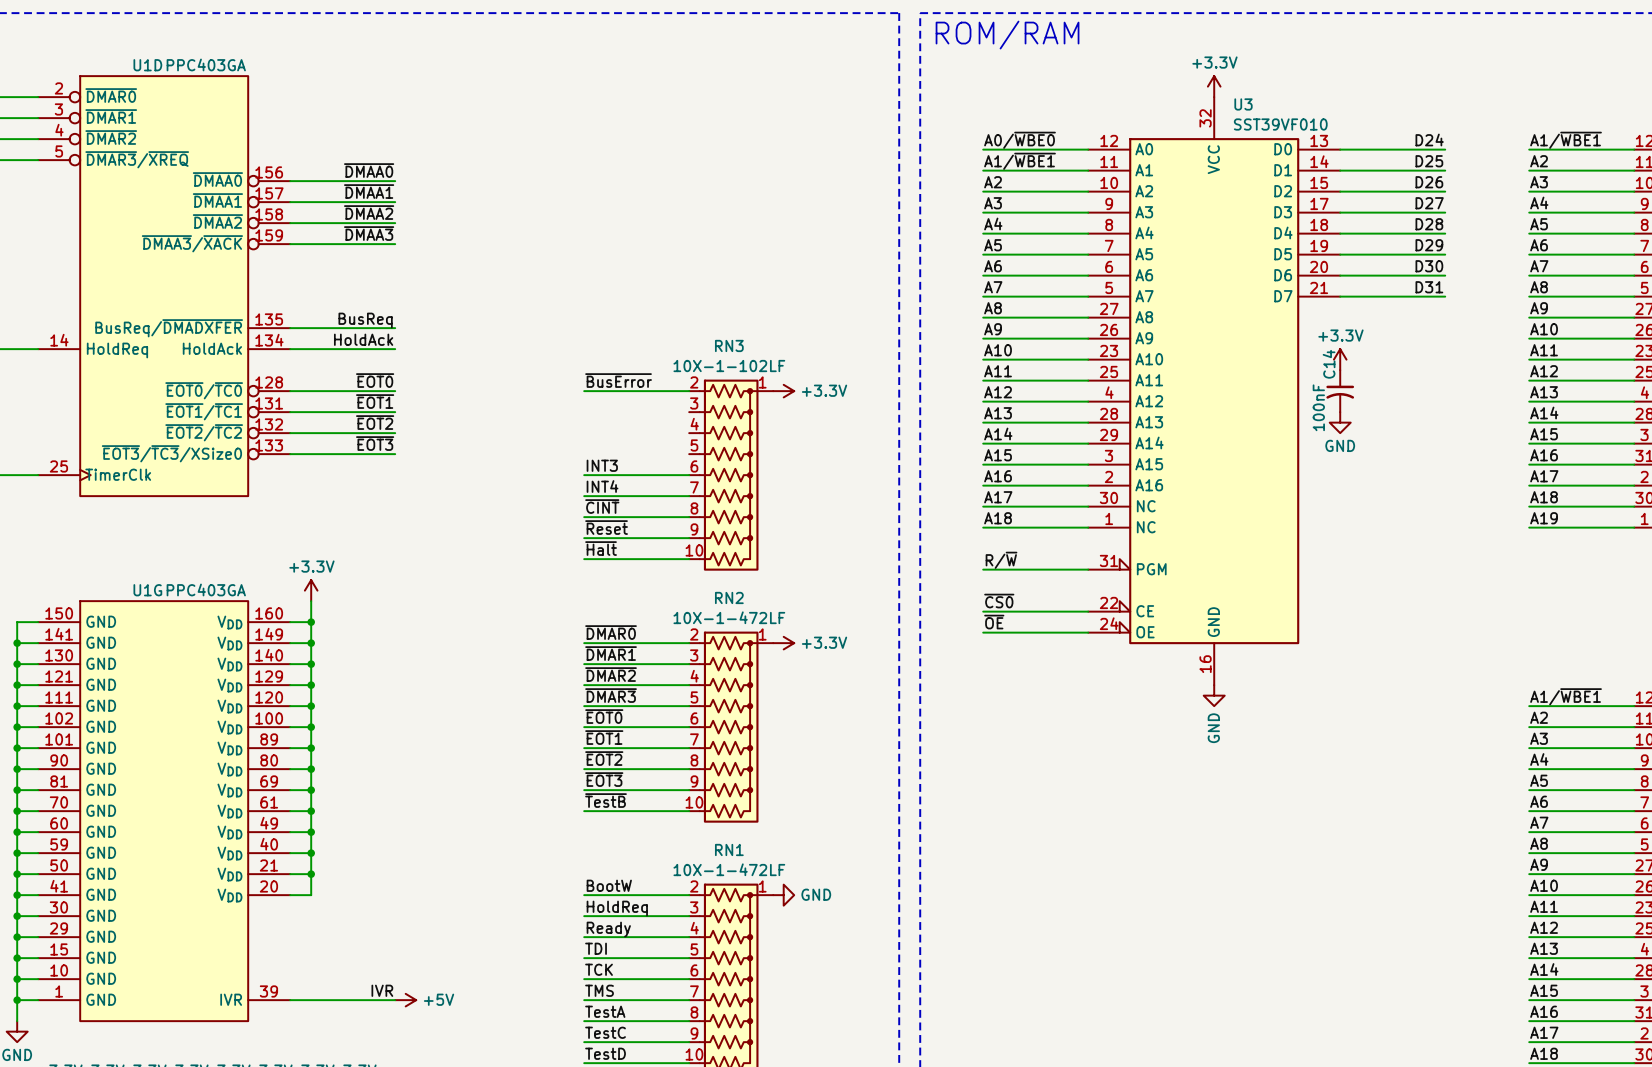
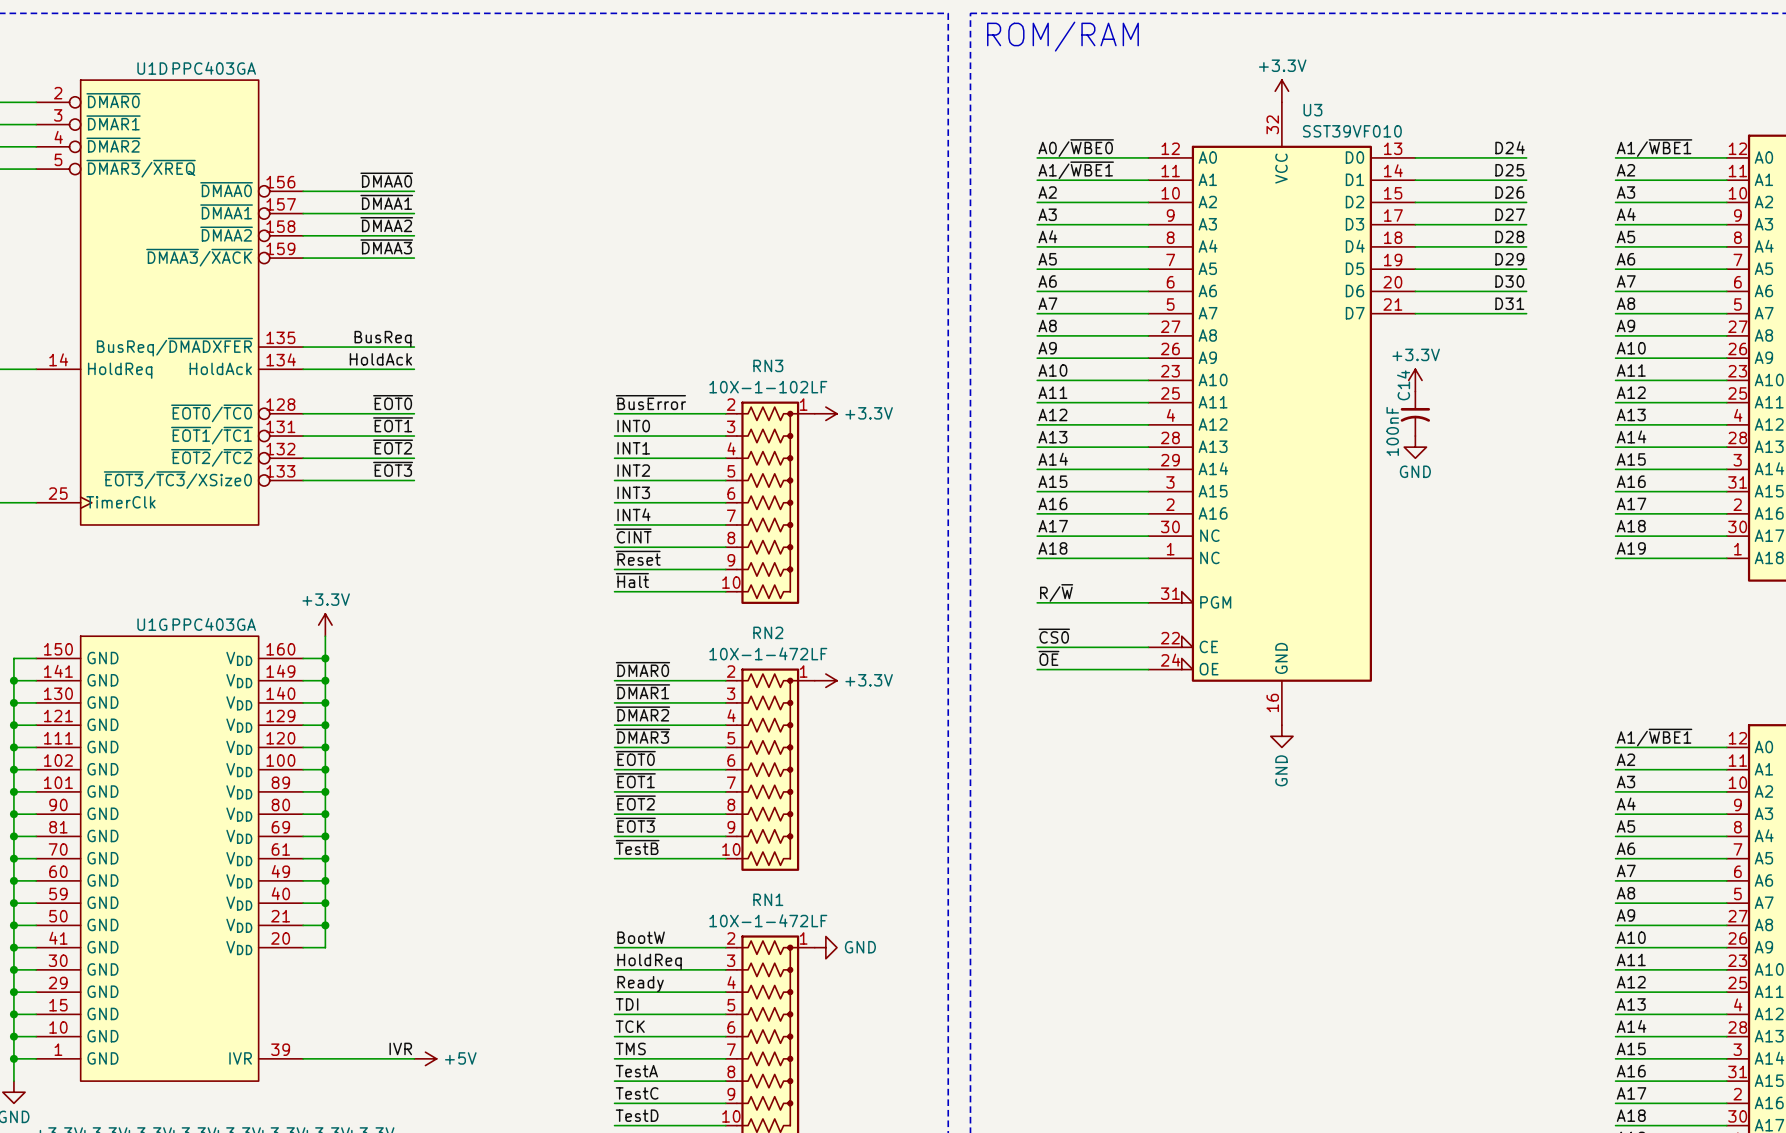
label: none -> INT0 (633, 426)
wire: none -> (614, 436) (725, 436)
label: none -> INT1 (633, 448)
wire: none -> (614, 458) (725, 458)
label: none -> INT2 (633, 470)
wire: none -> (614, 480) (725, 480)

